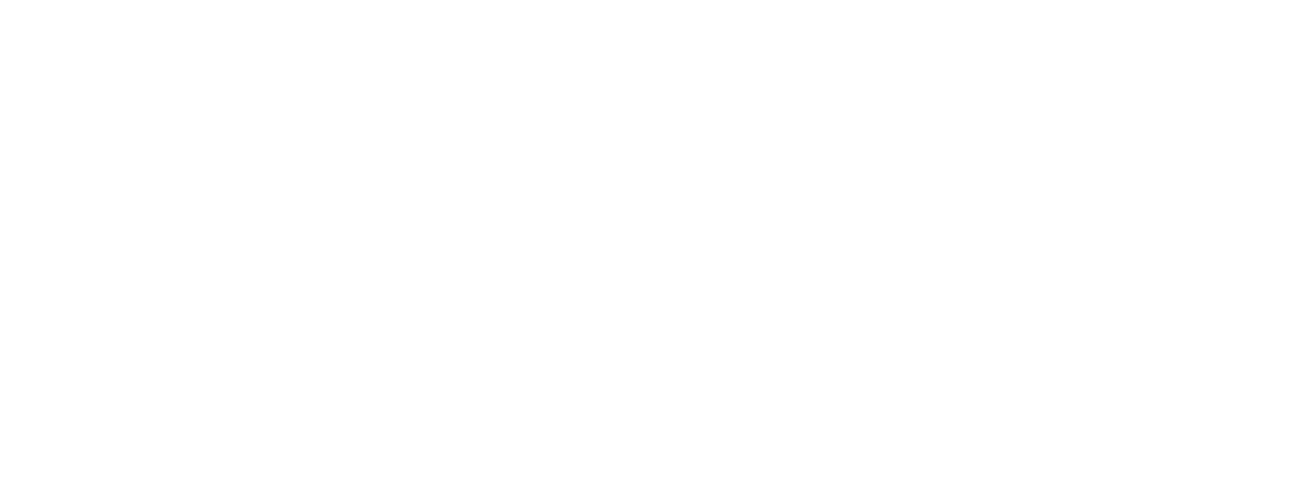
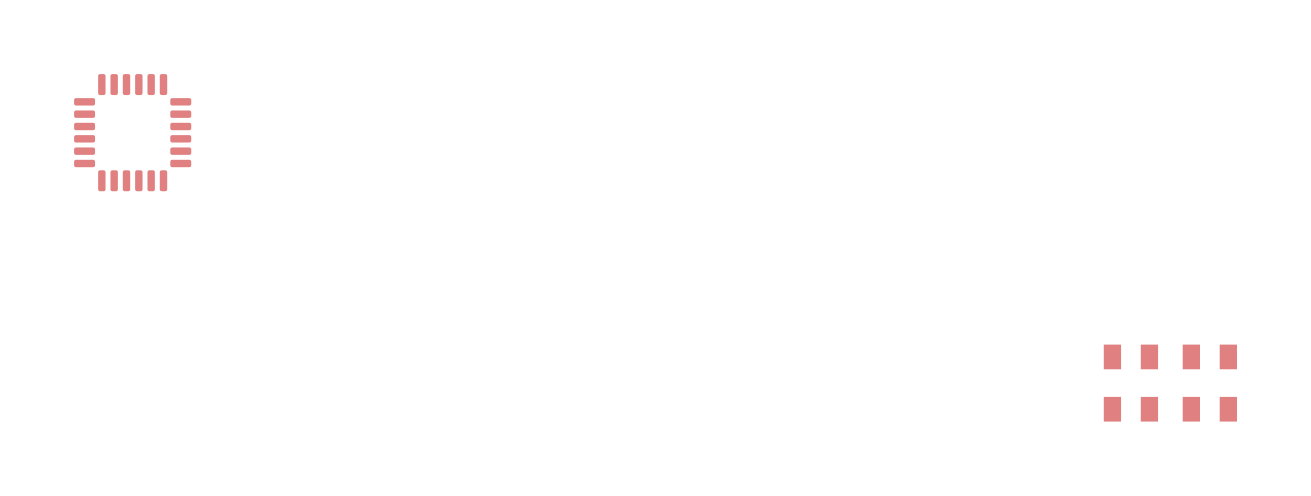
part: none -> (132, 132)
part: none -> (1130, 356)
part: none -> (1209, 356)
part: none -> (1130, 409)
part: none -> (1209, 409)

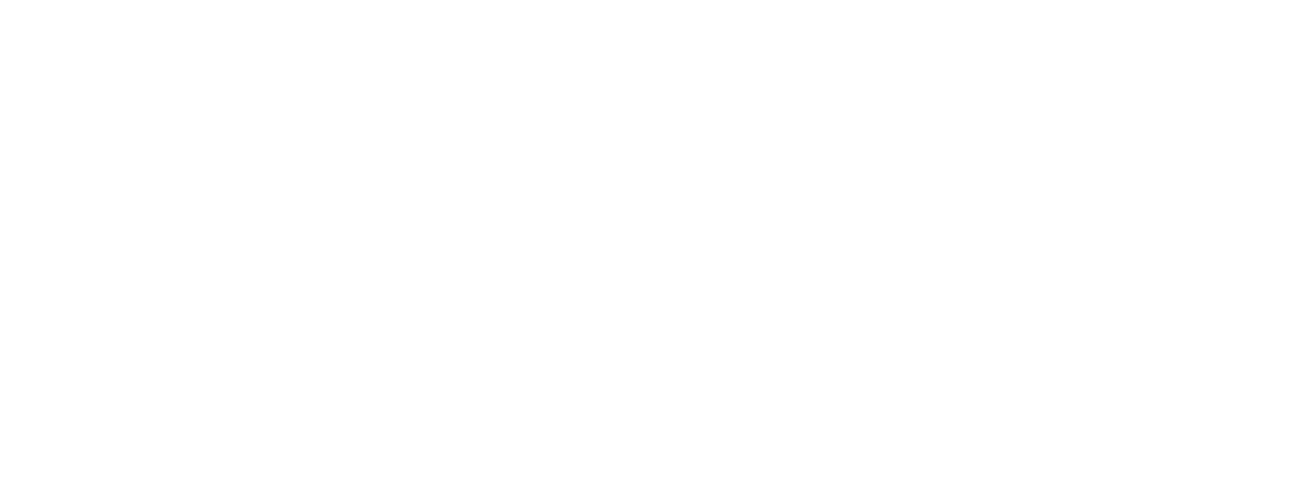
part: (132, 132) -> none
part: (1130, 356) -> none
part: (1209, 356) -> none
part: (1130, 409) -> none
part: (1209, 409) -> none

